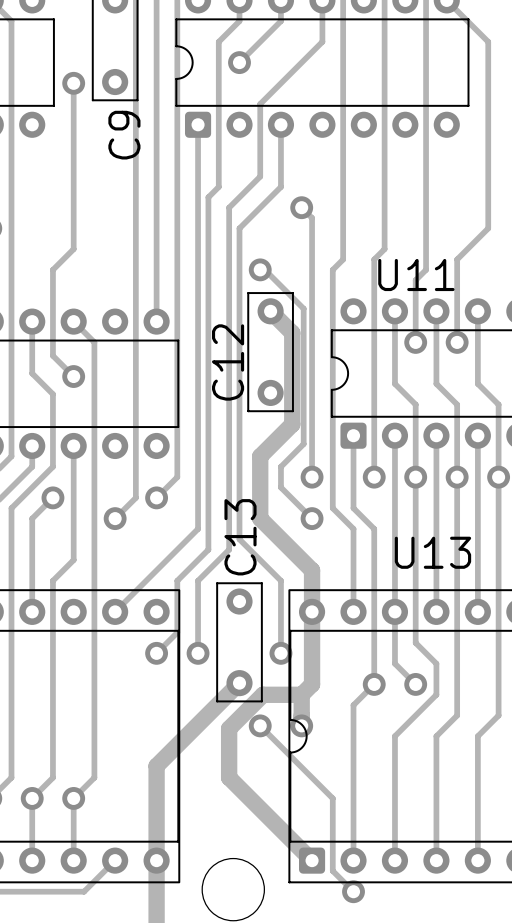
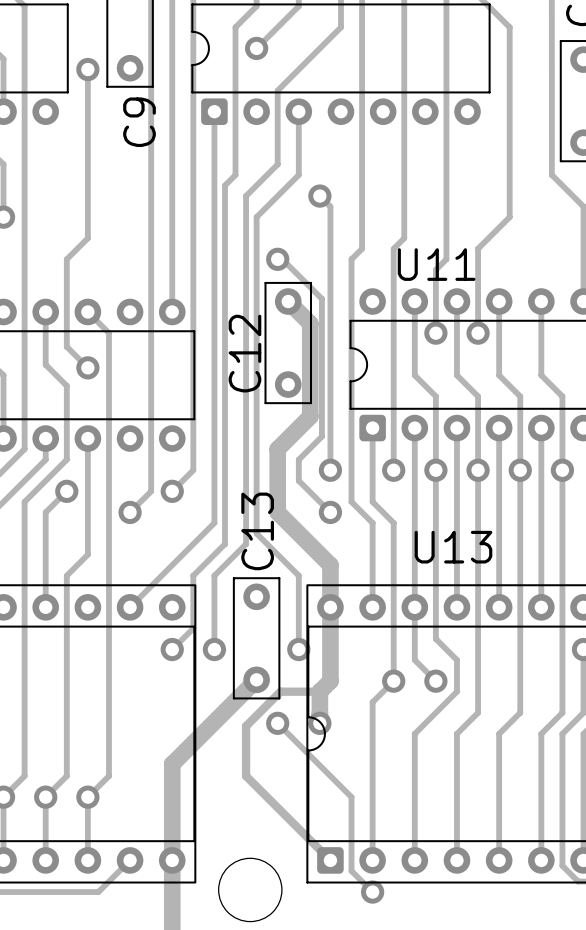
track width: thick (301, 694) (263, 694) (229, 728) (229, 777) (312, 860) -> thin (319, 691) (280, 691) (246, 726) (246, 776) (330, 860)

